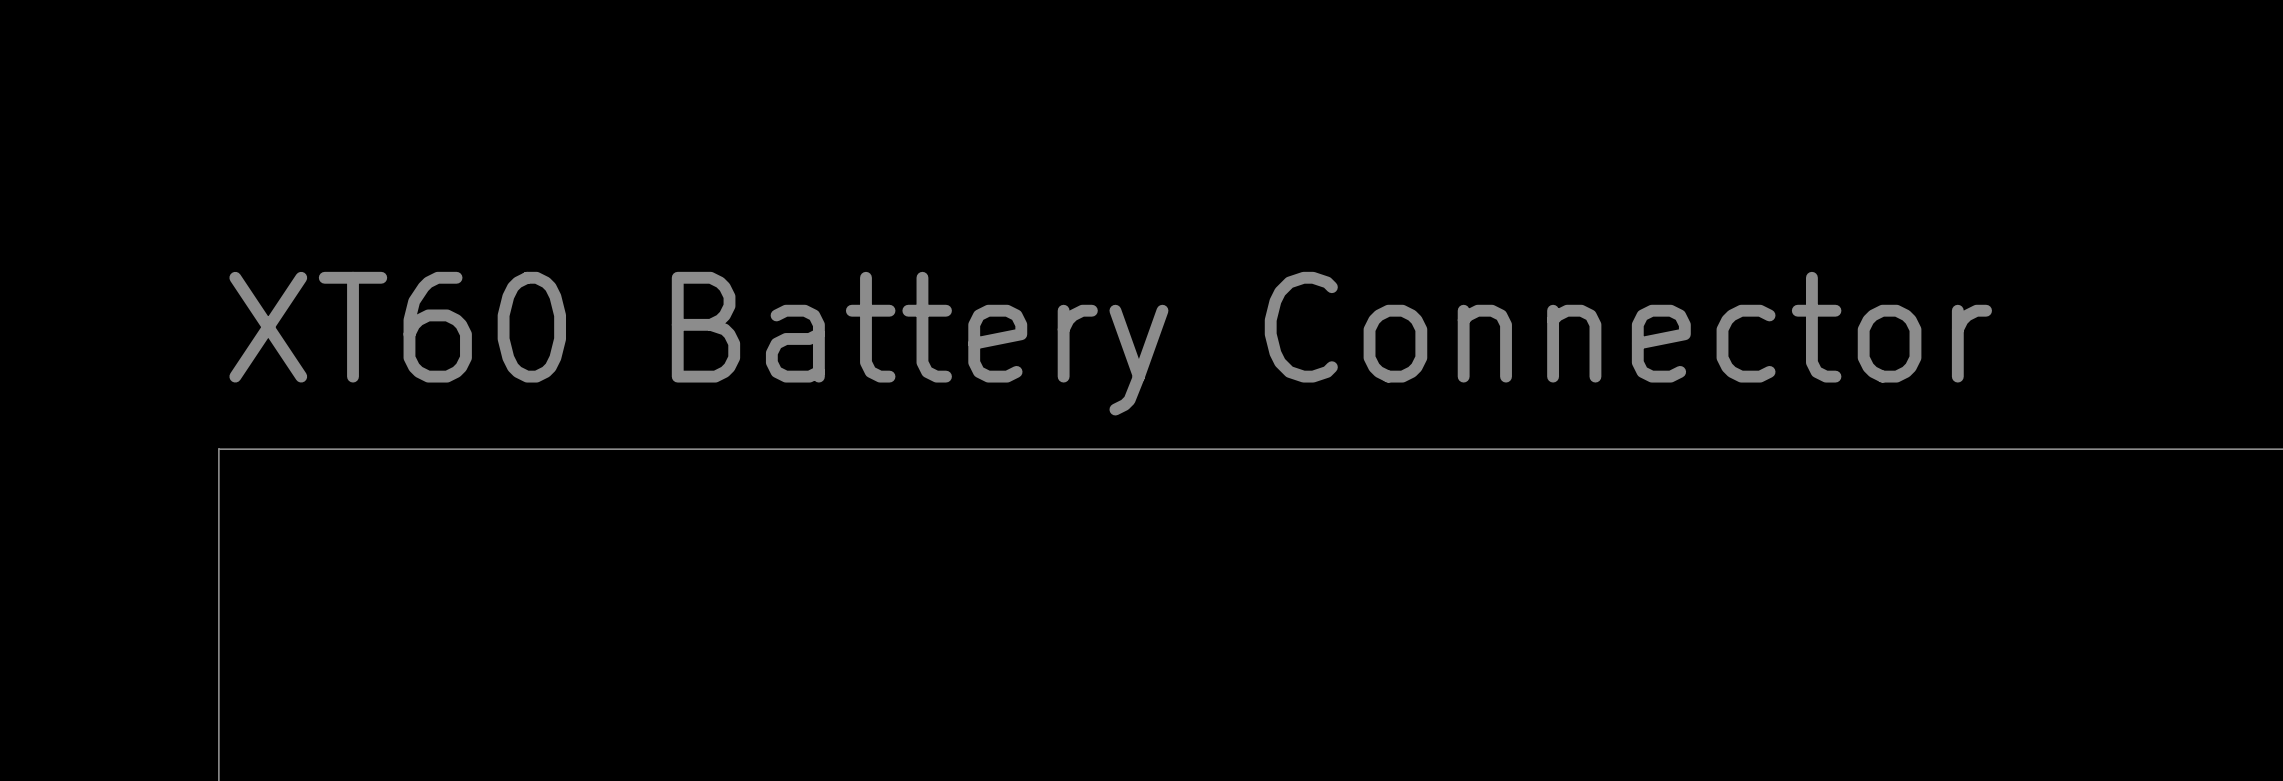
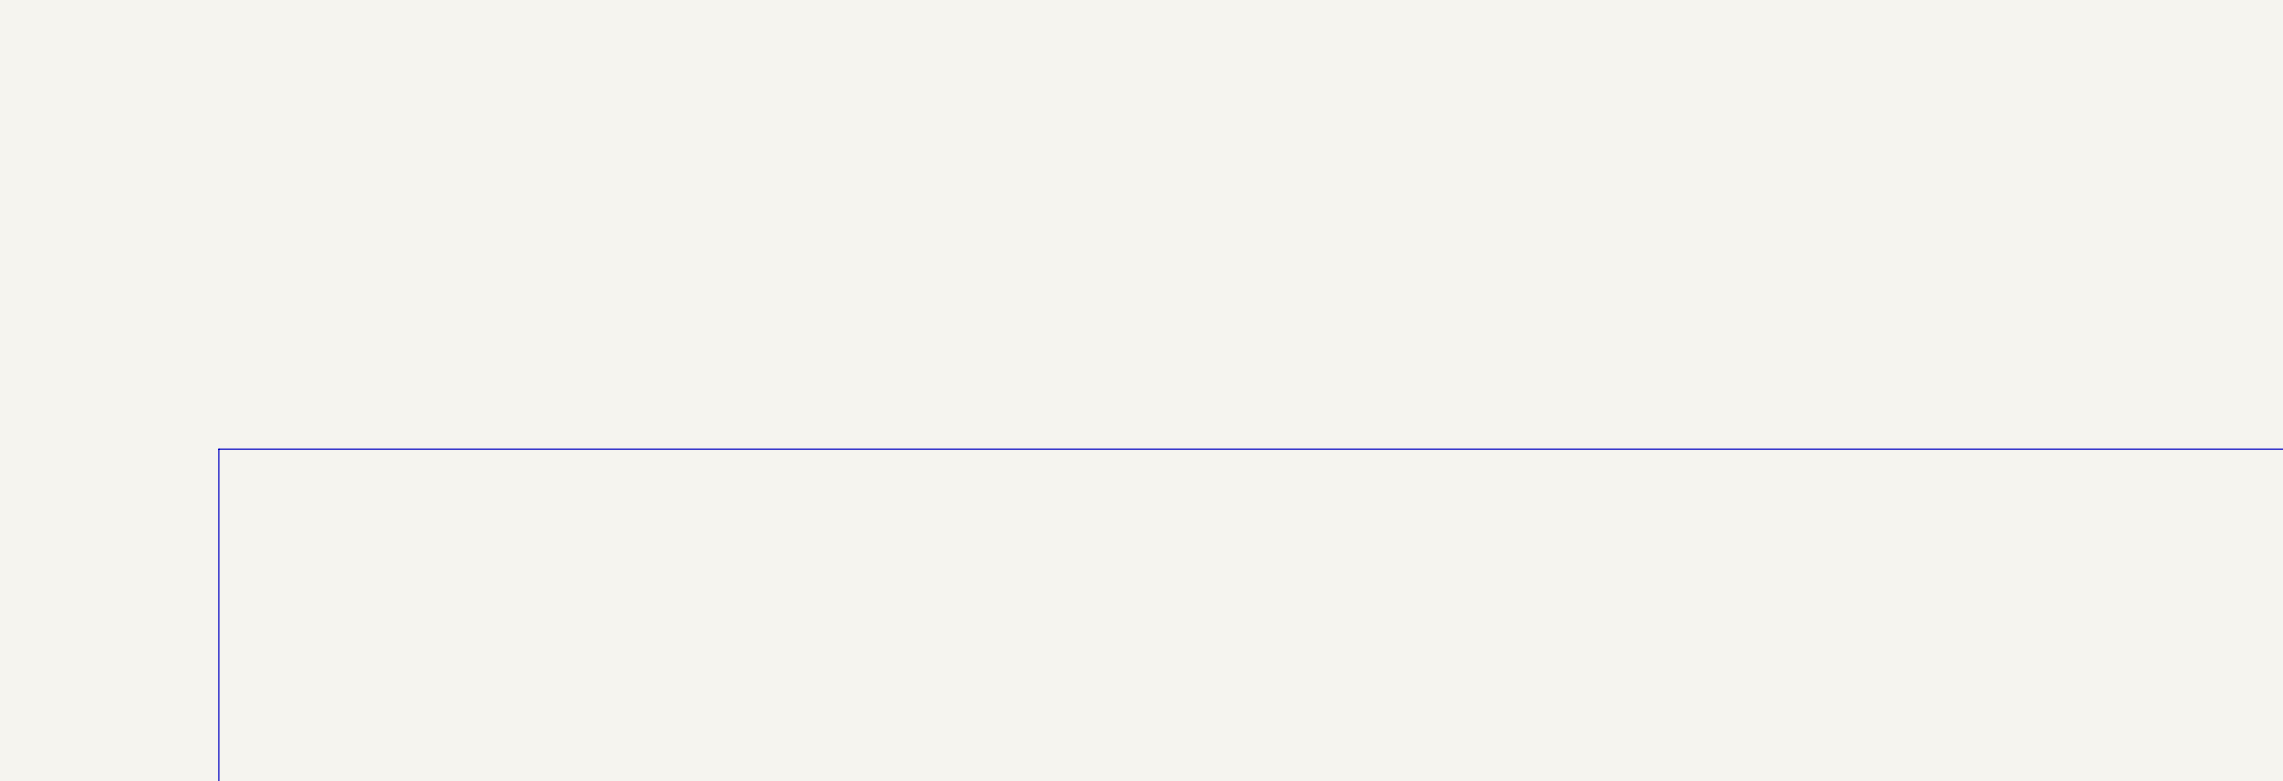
text: XT60 Battery Connector (1110, 343) -> none

